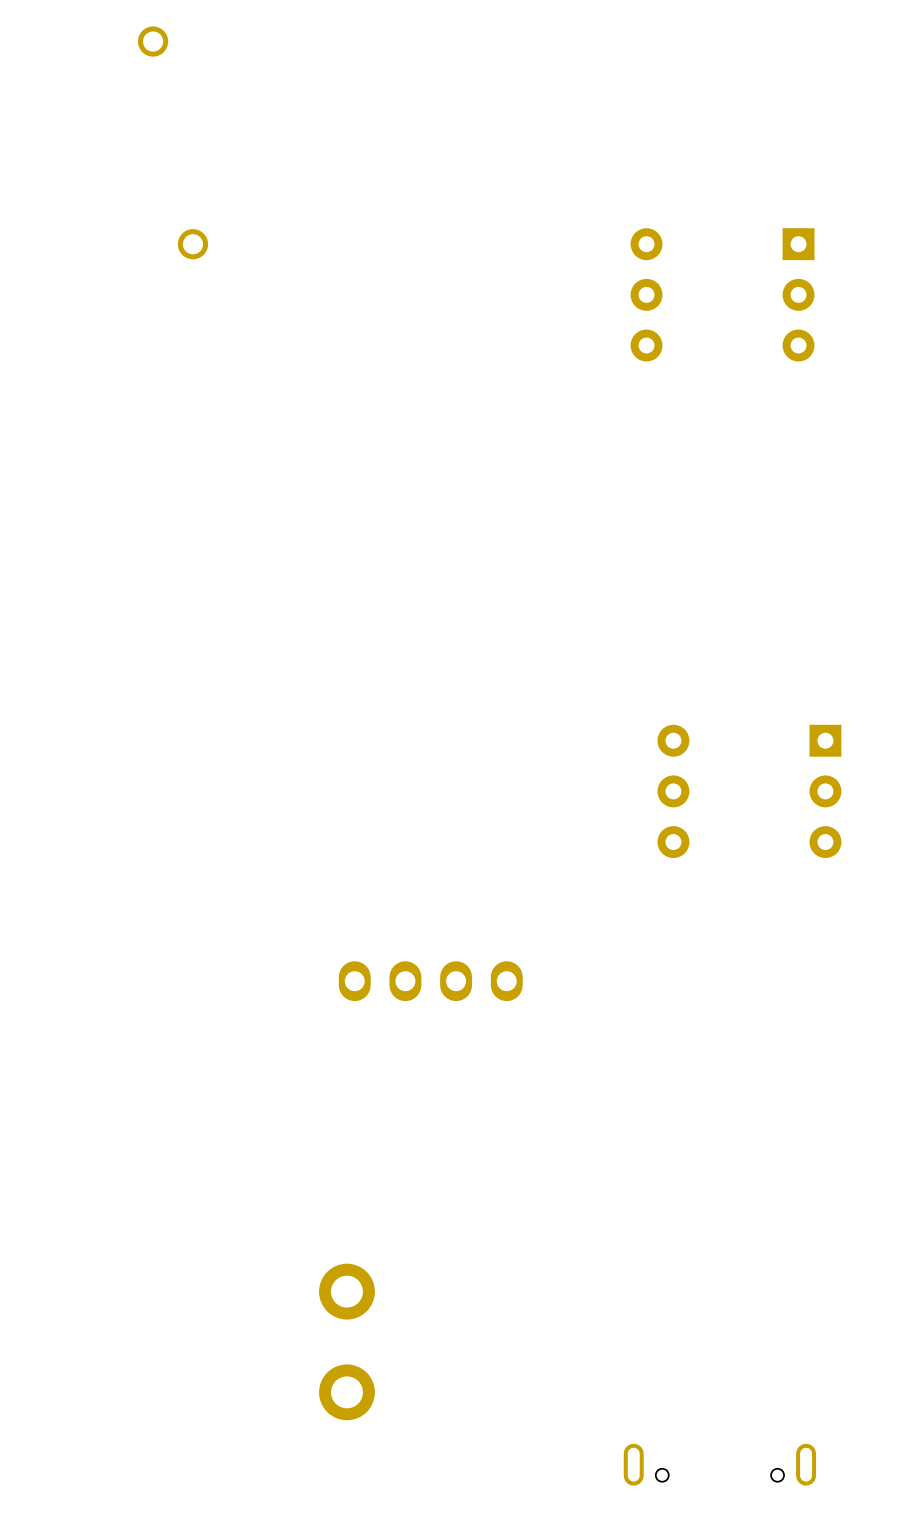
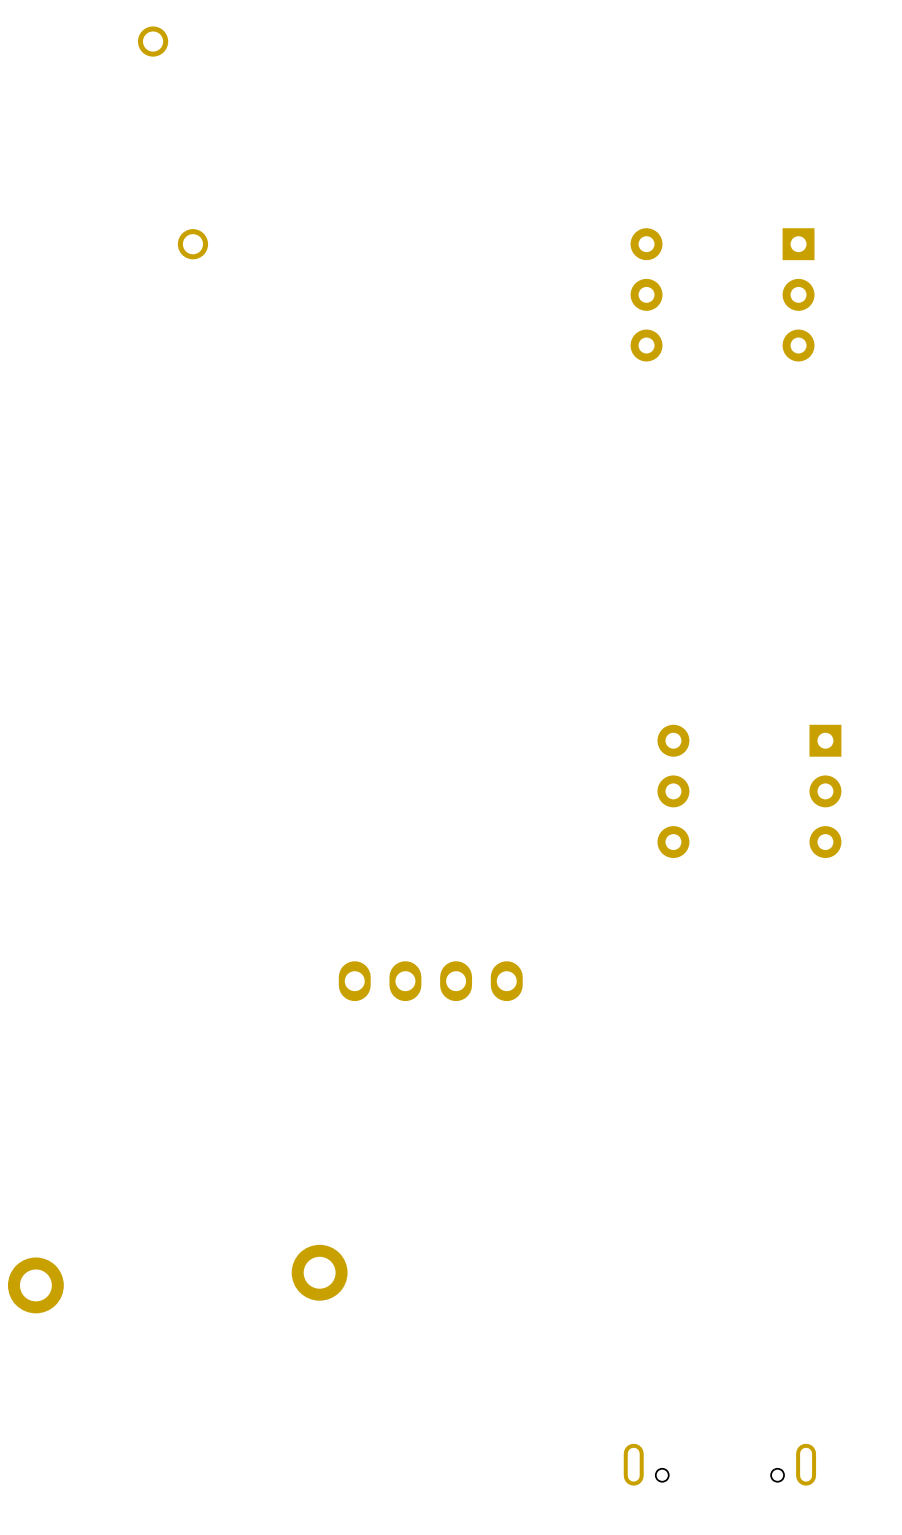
part: none -> (35, 1285)
part position: (346, 1291) -> (319, 1272)
part: (346, 1392) -> none

